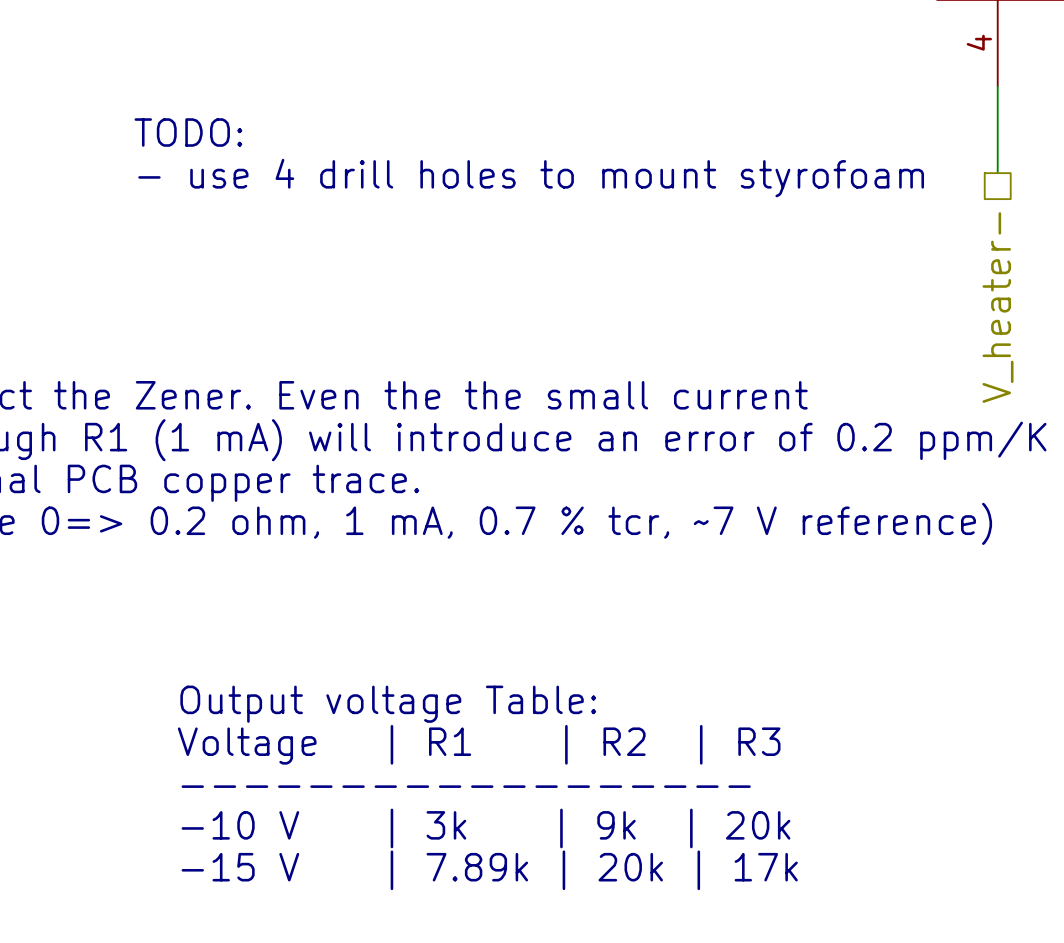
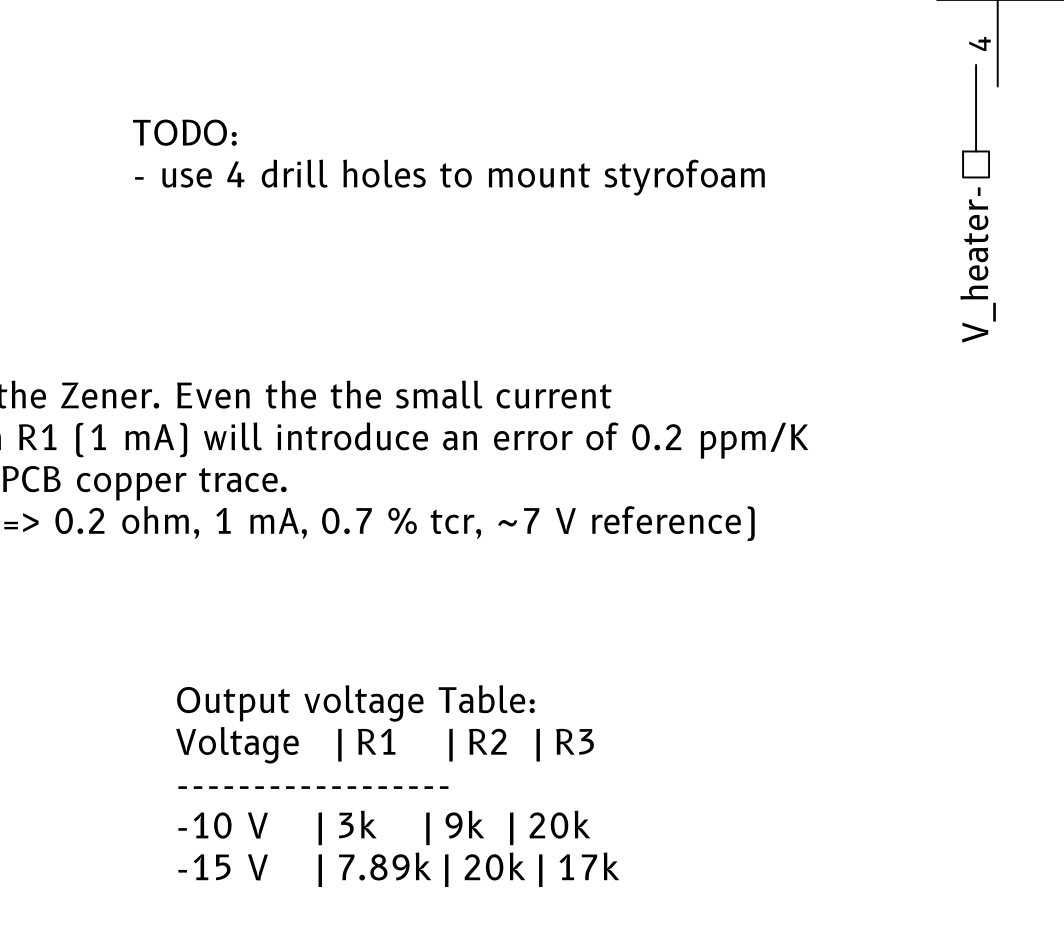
wire: (997, 86) (997, 173) -> (976, 64) (976, 151)
hierarchical label position: V_heater- (997, 307) -> V_heater- (978, 265)

